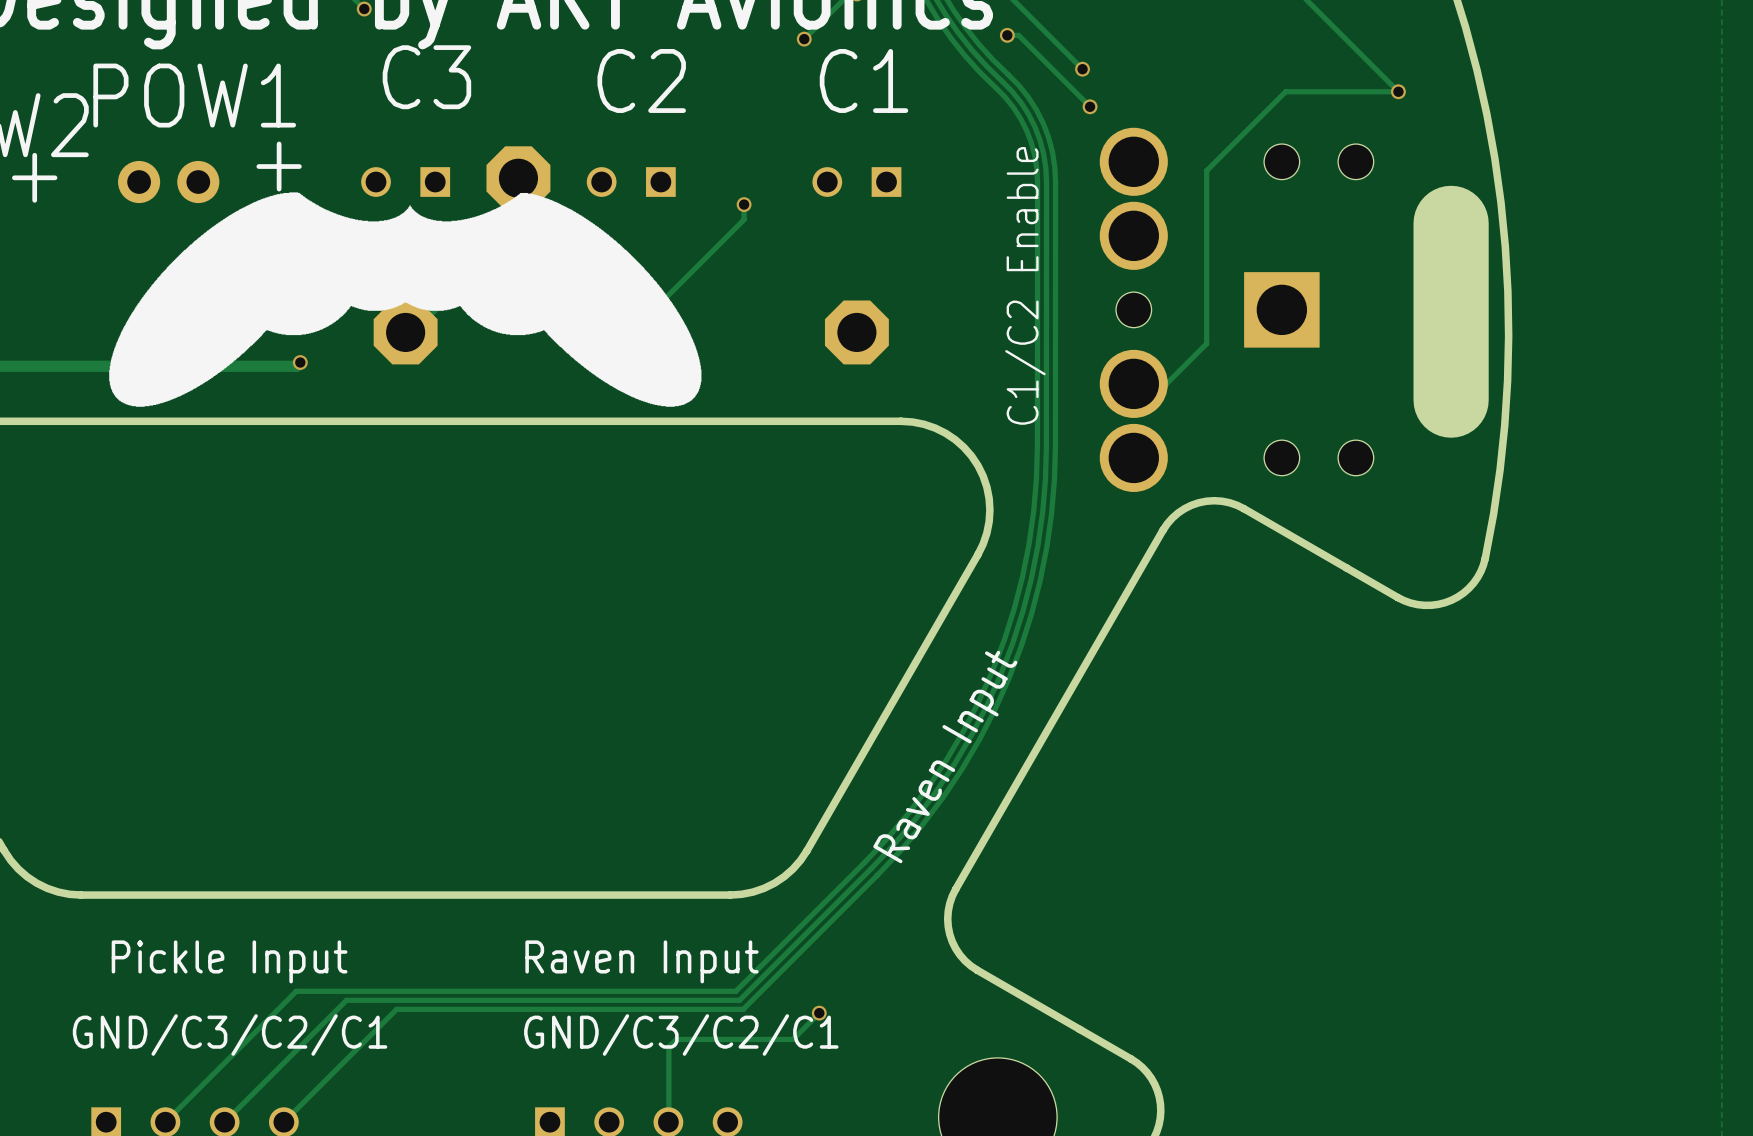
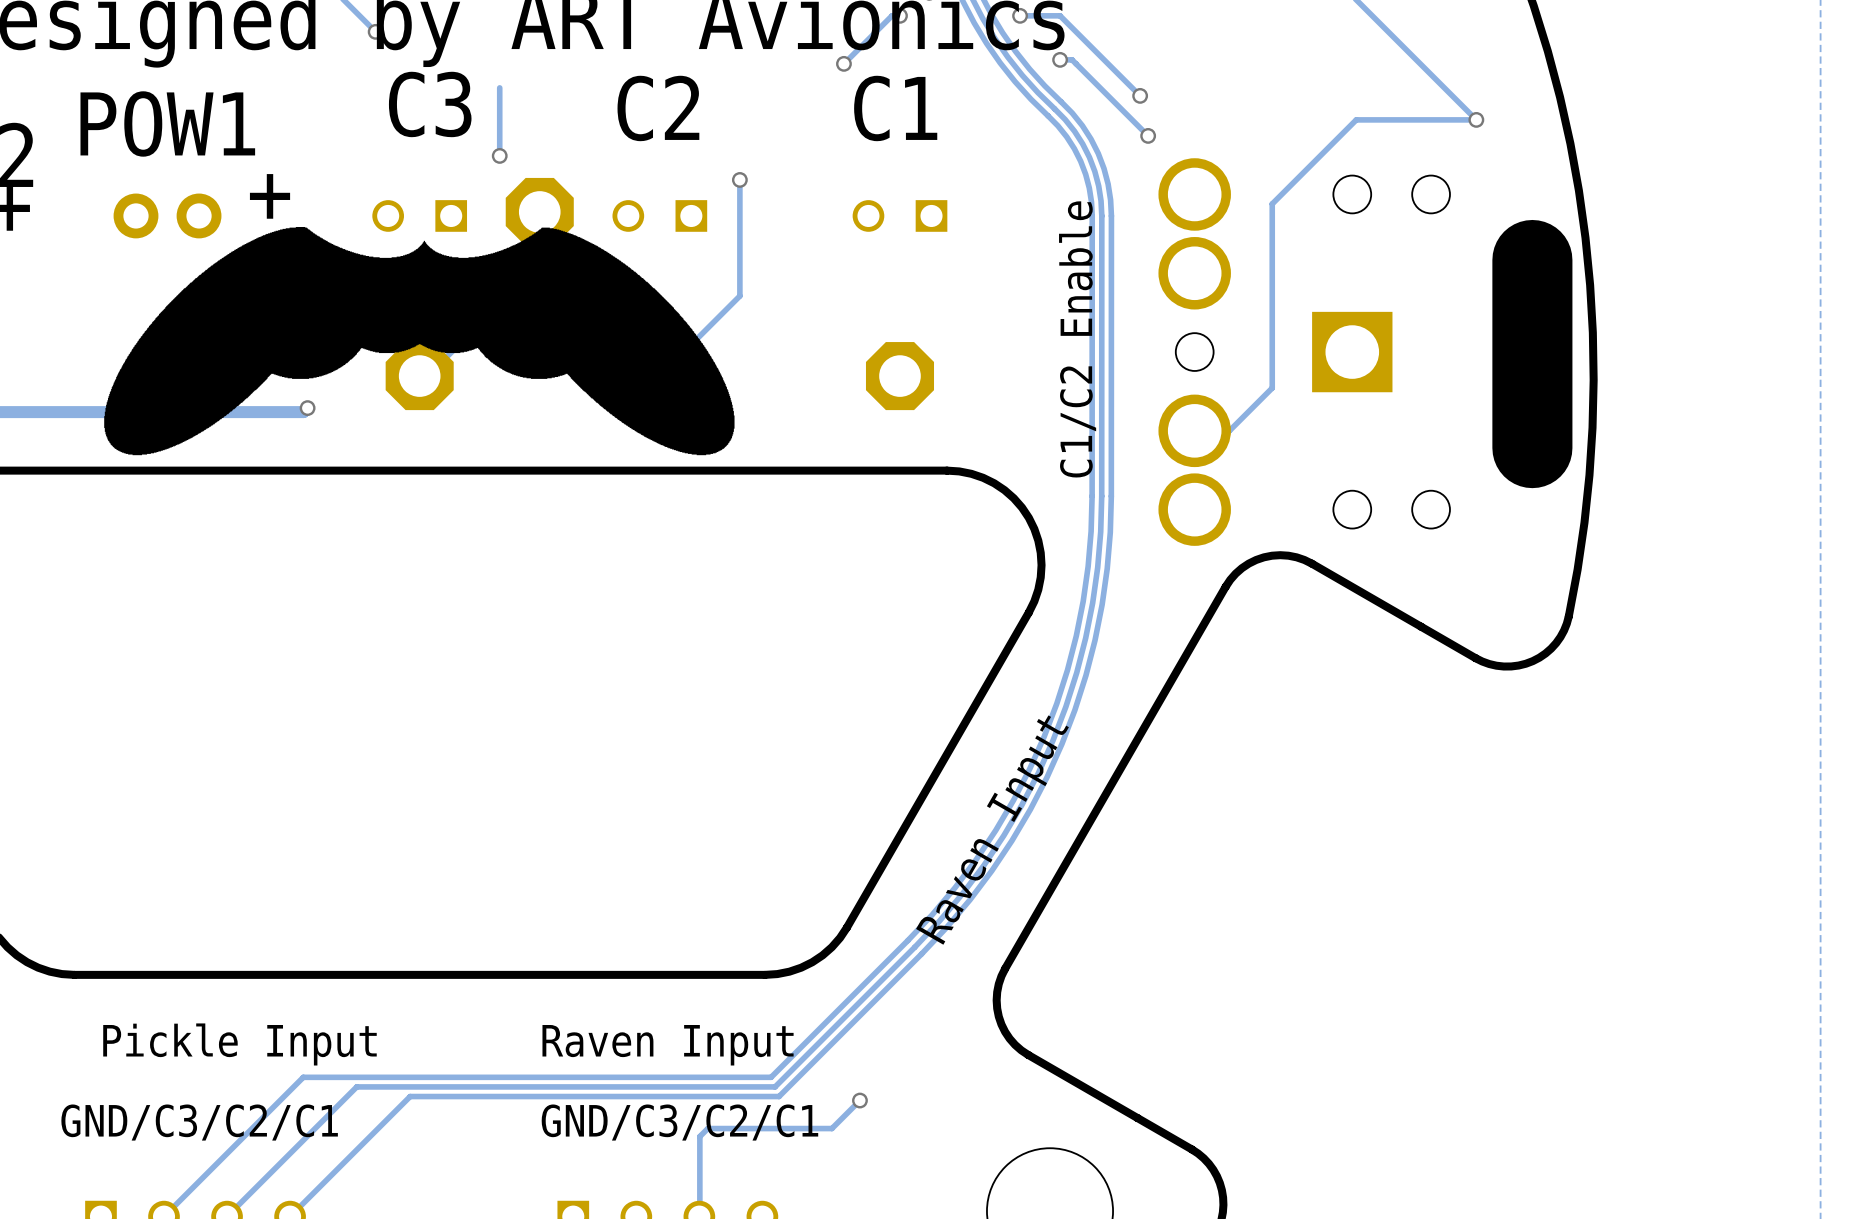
track: none -> (499, 87) (499, 155)
via: none -> (499, 155)
track: (744, 204) (744, 219) (706, 257) -> (739, 179) (739, 296)
via position: (744, 204) -> (739, 179)

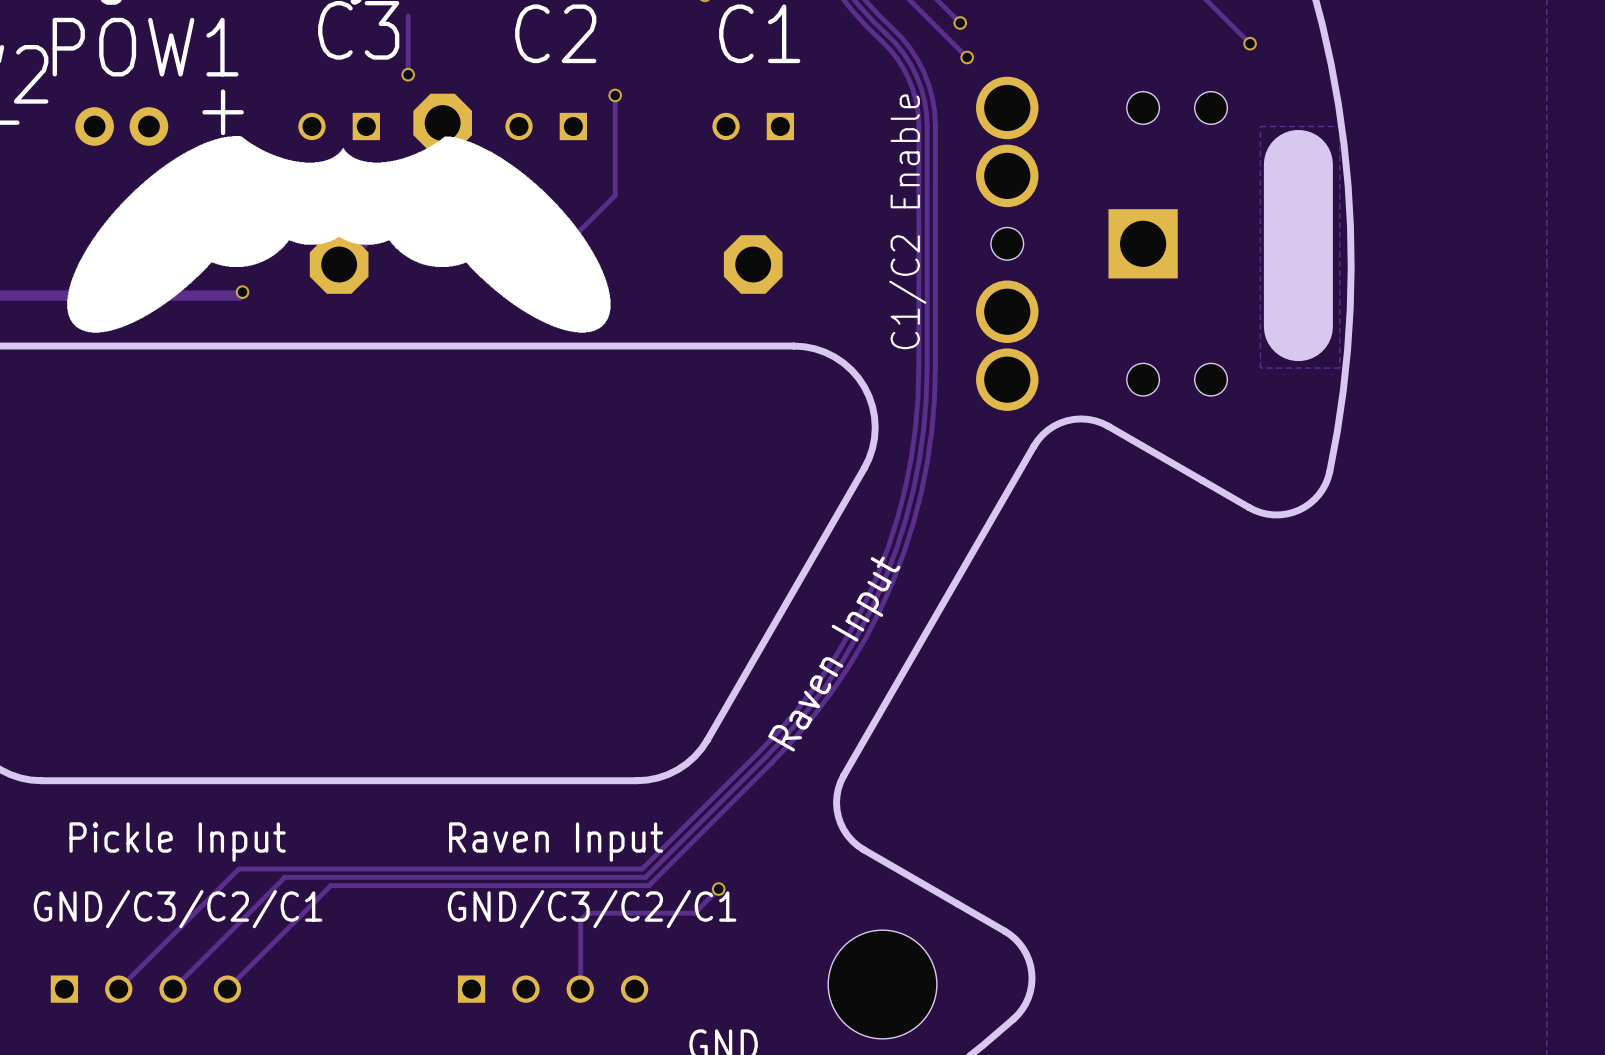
track: (1476, 119) (1356, 119) (1272, 203) (1272, 388) (1229, 430) (1194, 430) -> none
zone outline: none -> (1339, 126) (1260, 126) (1260, 368) (1339, 368) (1339, 126)

